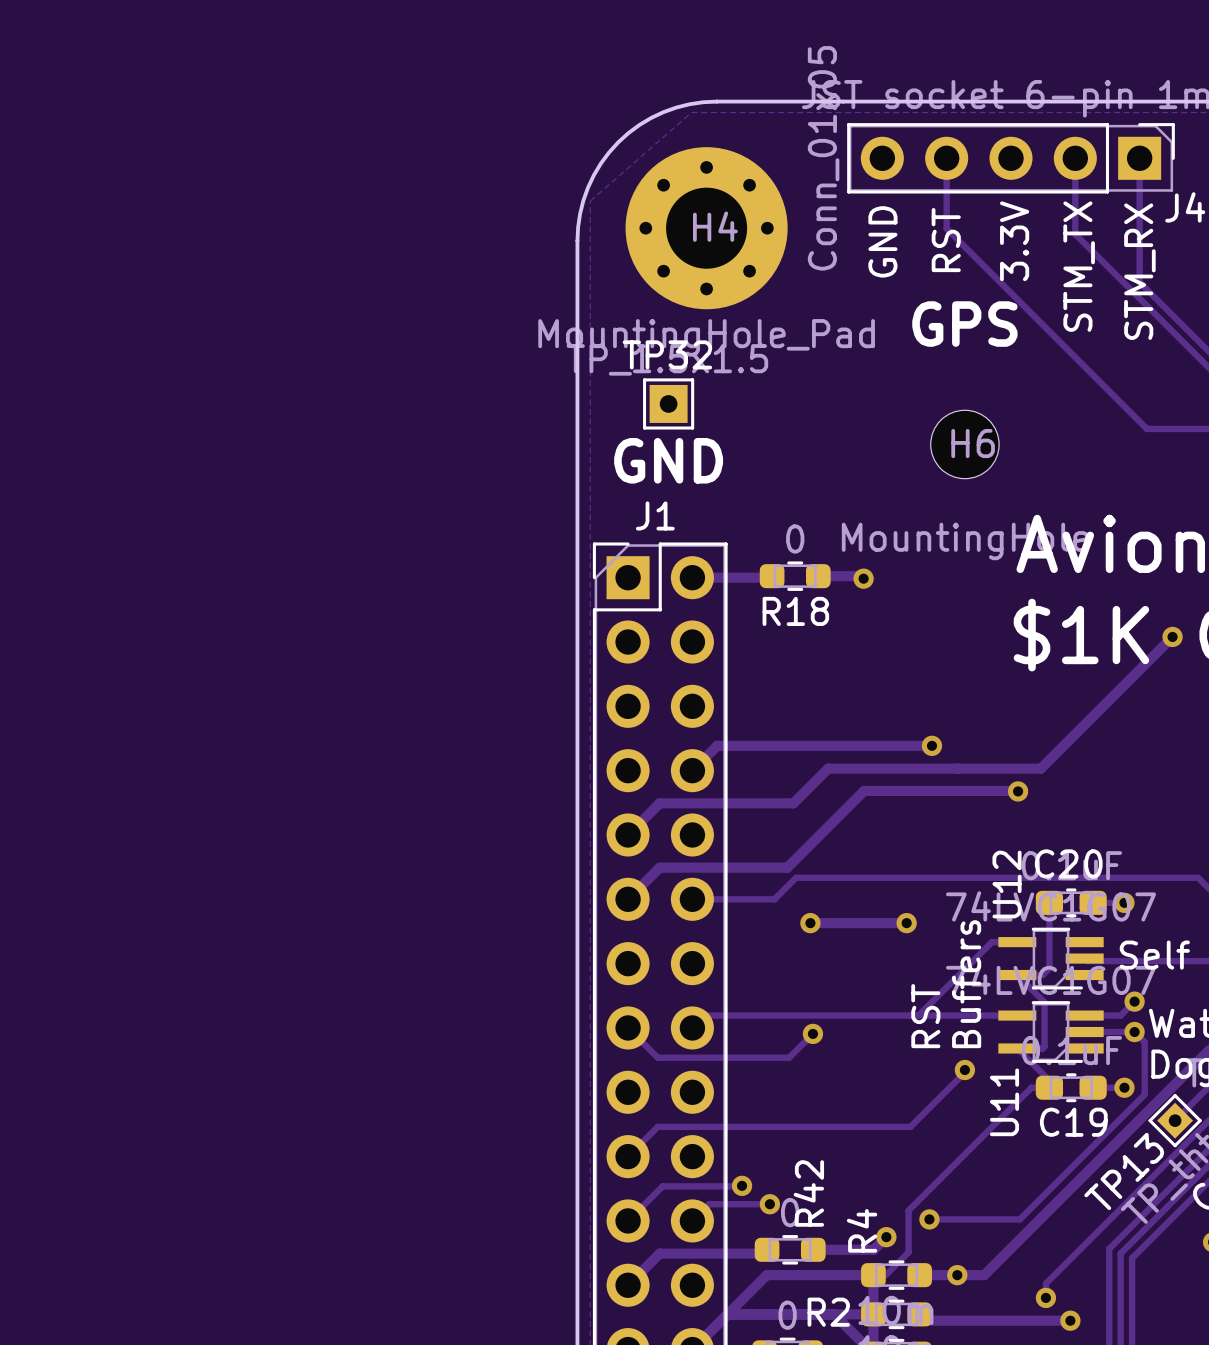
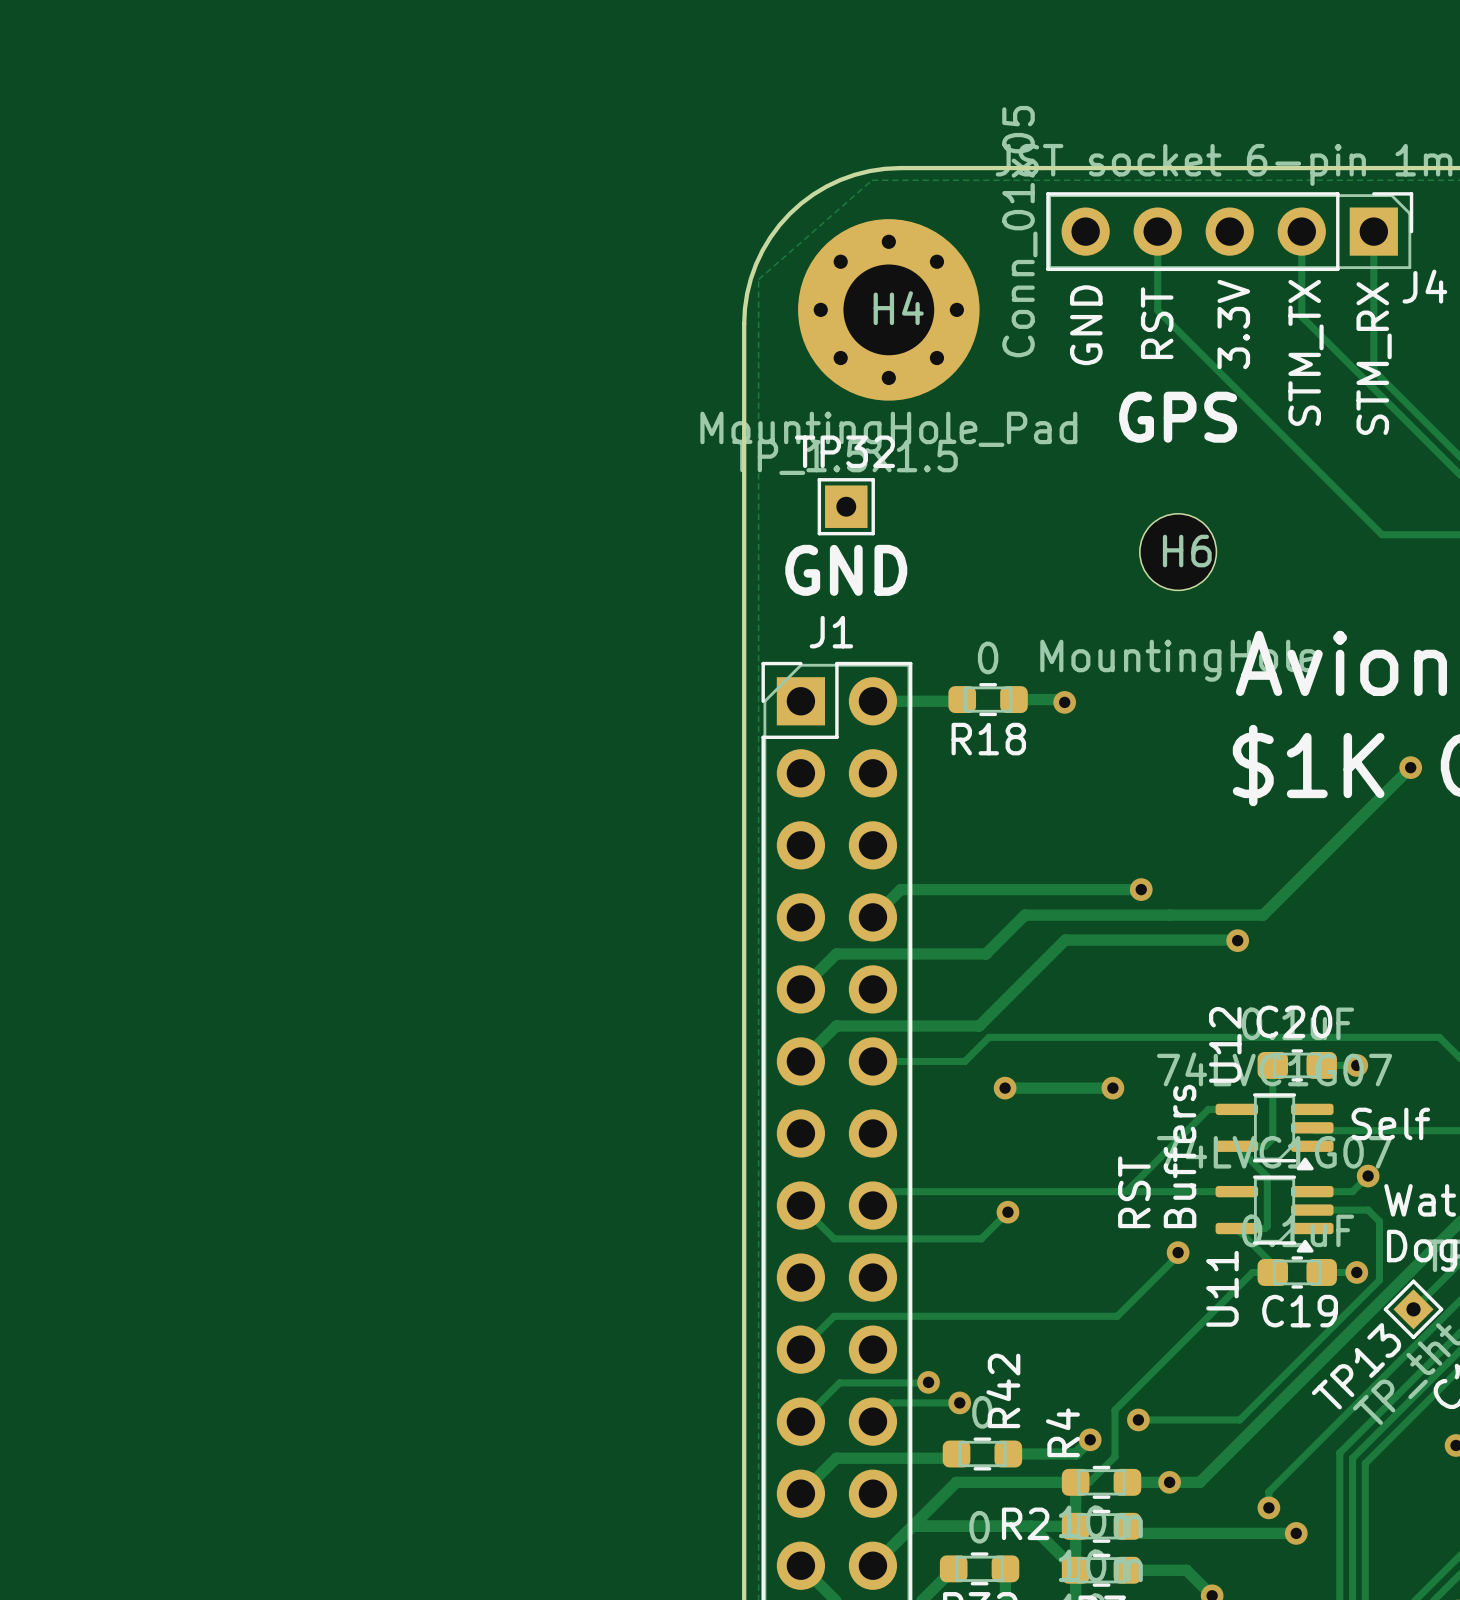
U12 footprint: [998, 927, 1104, 990] -> [1215, 1093, 1334, 1171]
U11 footprint: [998, 1001, 1104, 1063] -> [1215, 1175, 1334, 1253]
via: (1134, 1032) -> none

